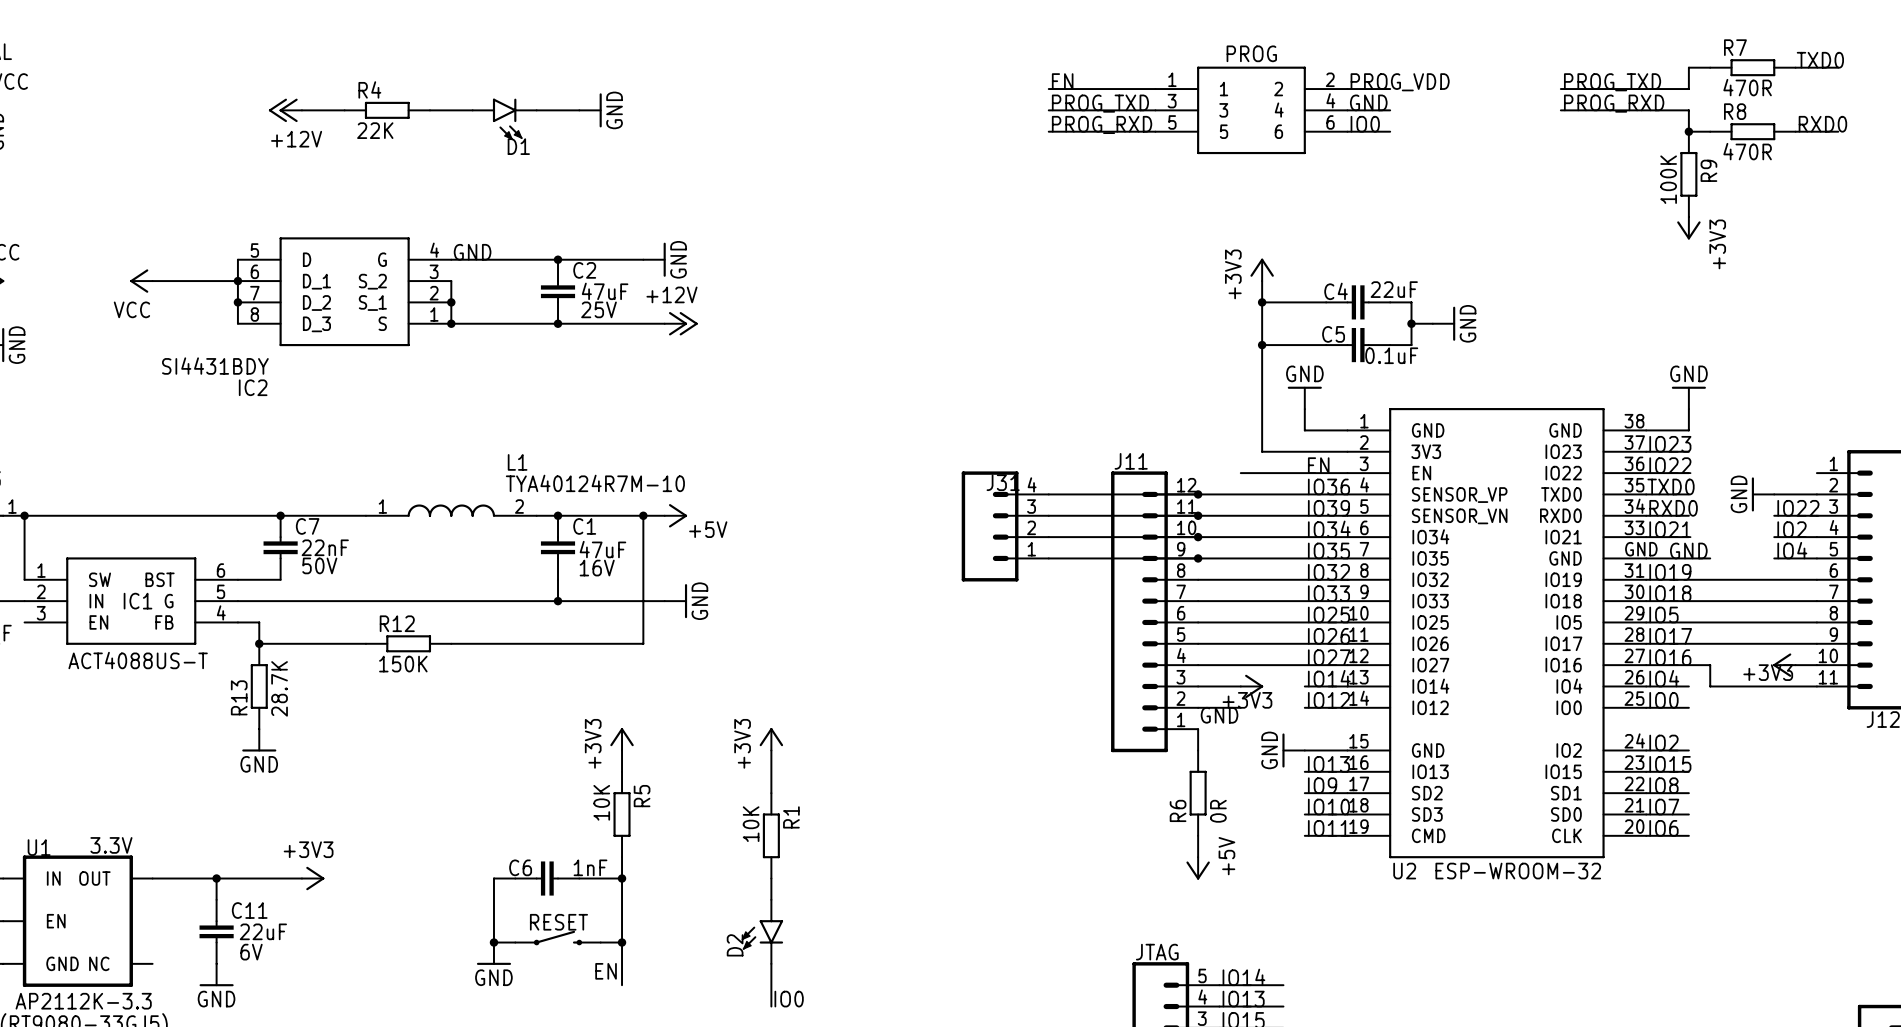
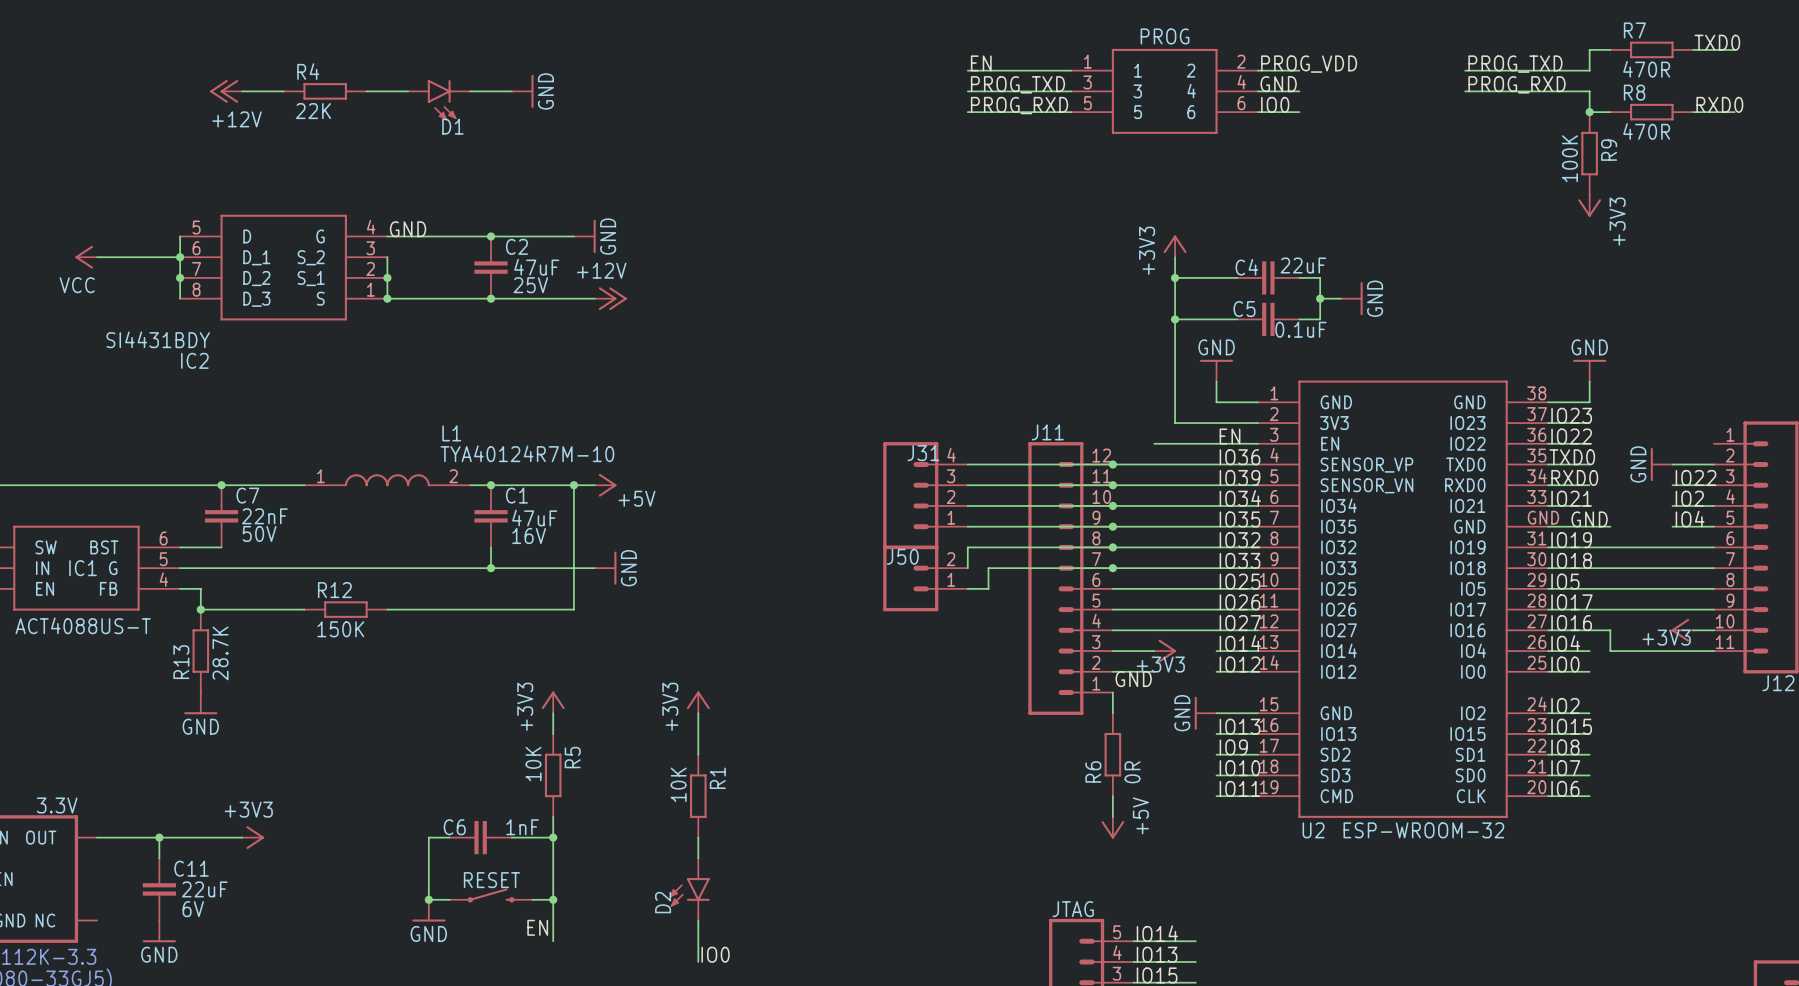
wire: none -> (1112, 547) (967, 547) (967, 568)
junction: none -> (1112, 547)
wire: none -> (1112, 568) (988, 568) (988, 588) (967, 588)
junction: none -> (1112, 568)
J50: none -> (925, 578)

